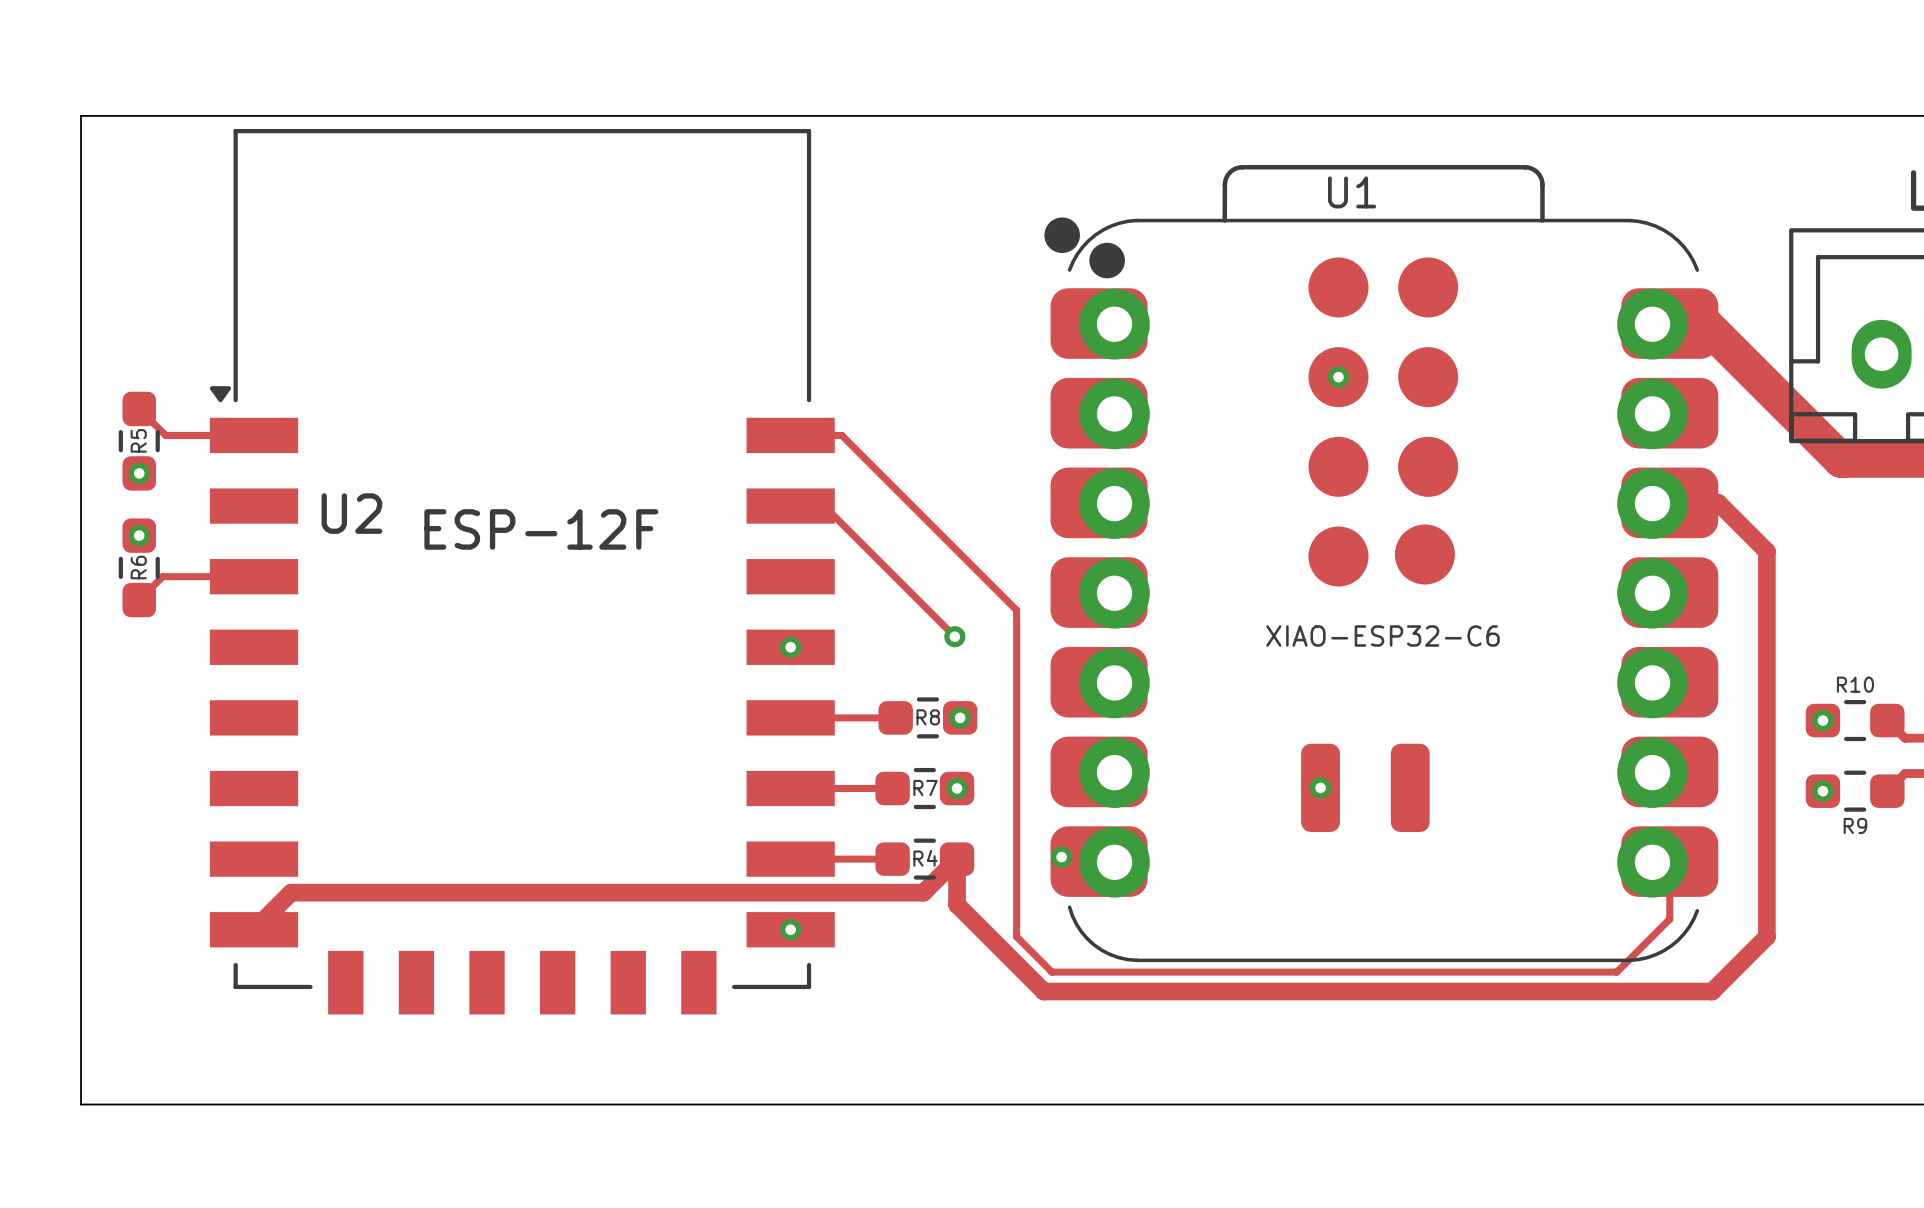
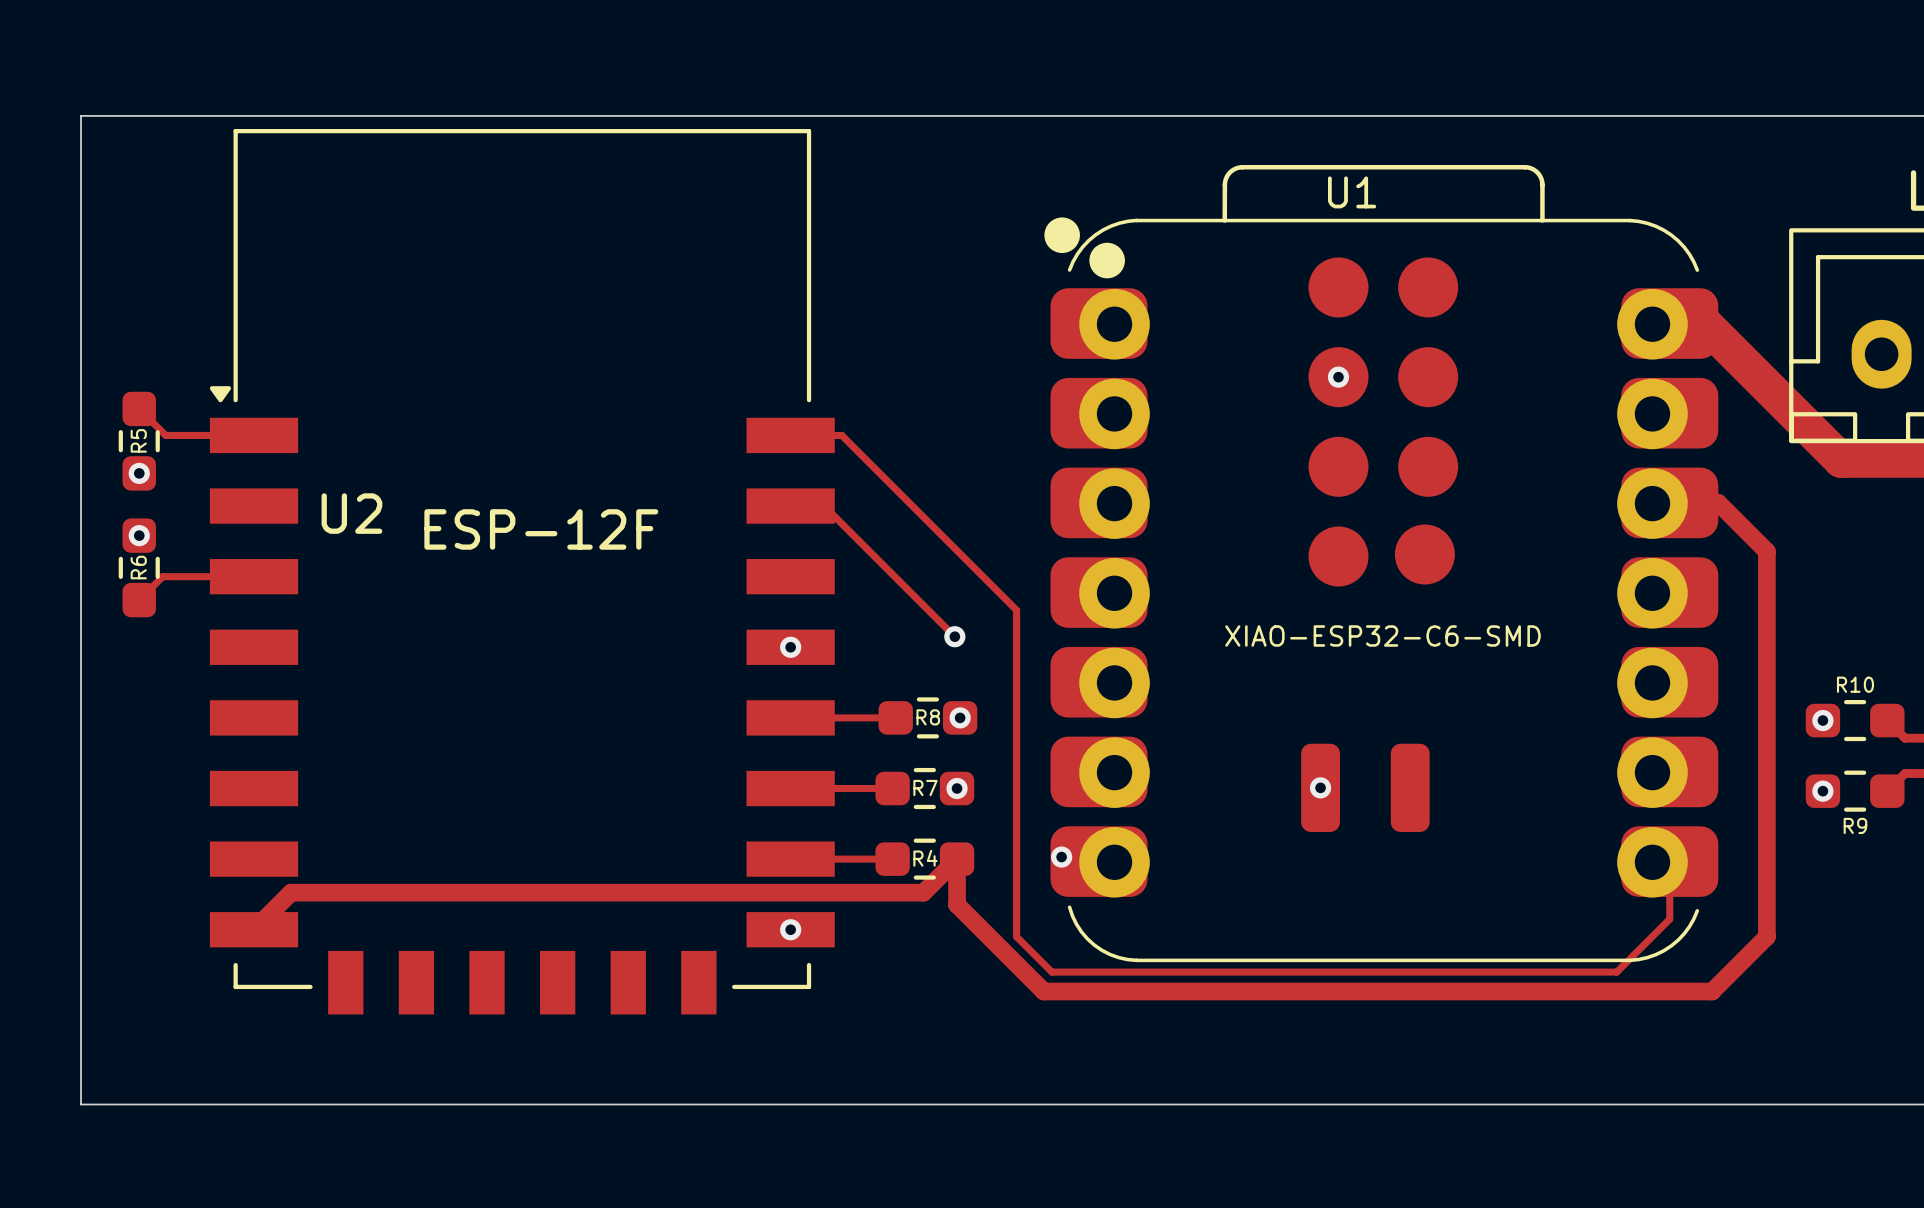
U1 value: XIAO-ESP32-C6 (1383, 635) -> XIAO-ESP32-C6-SMD (1383, 635)

